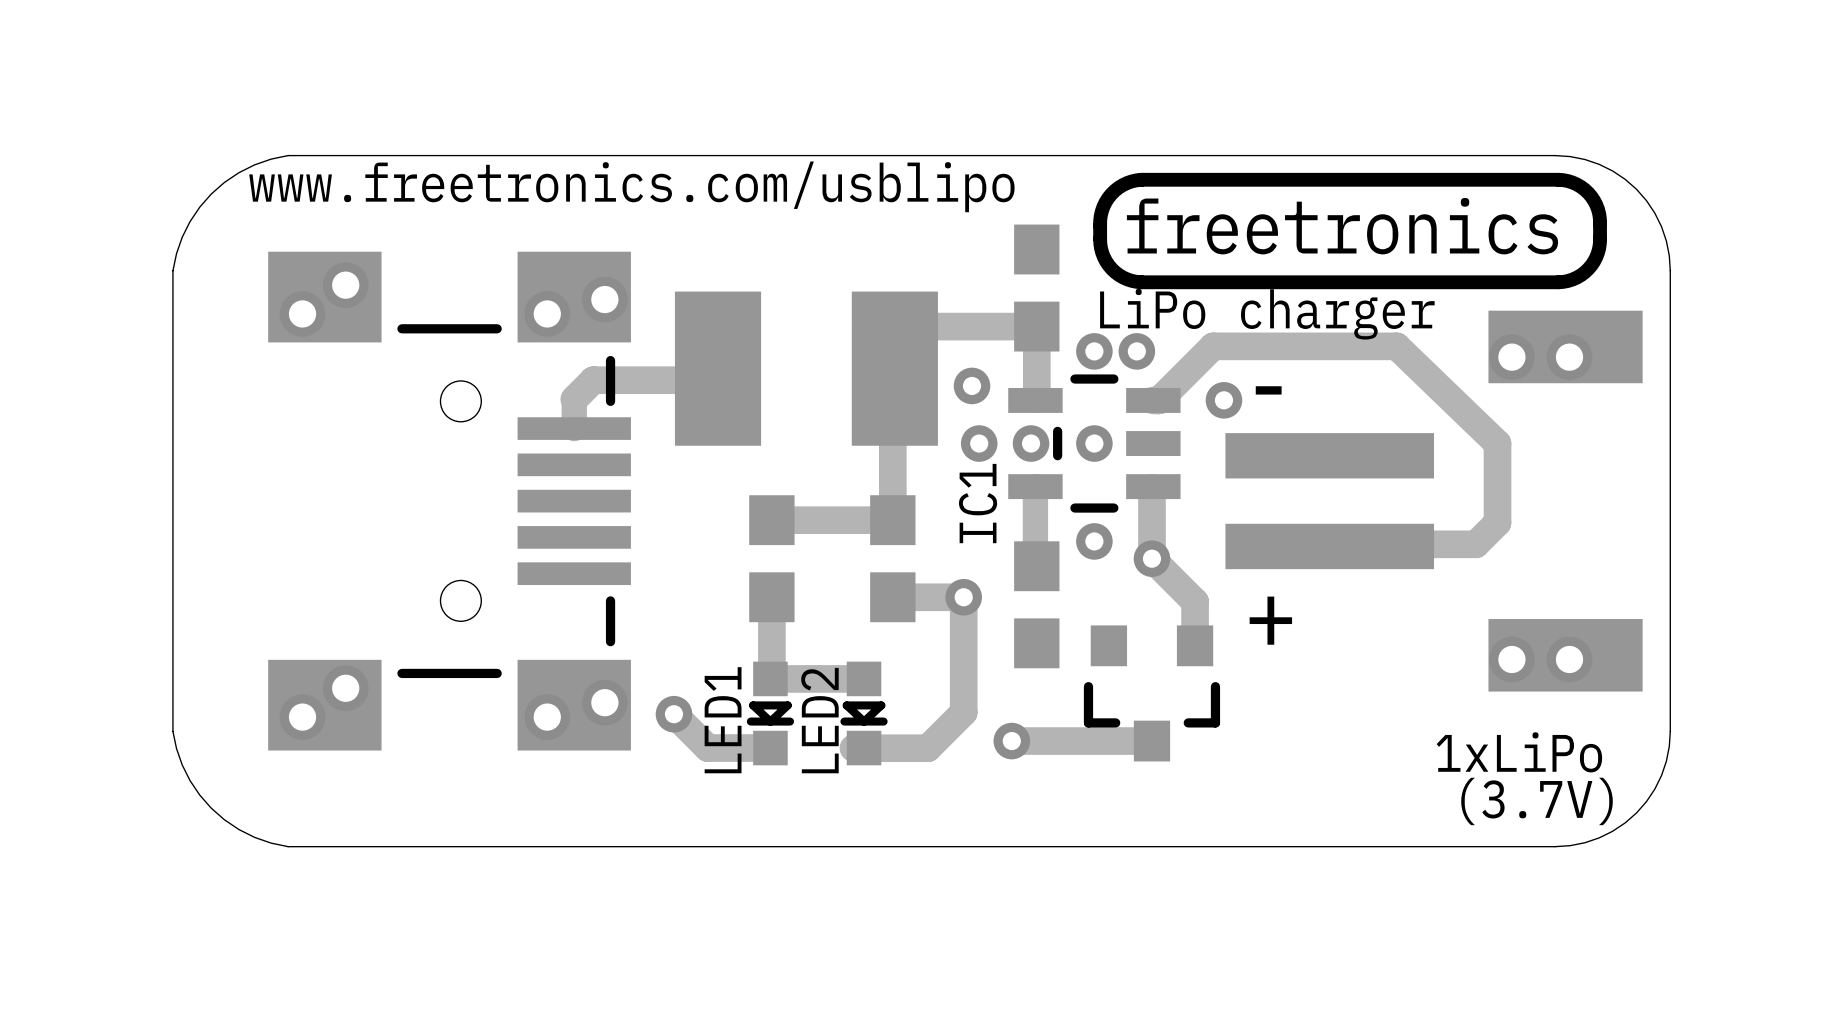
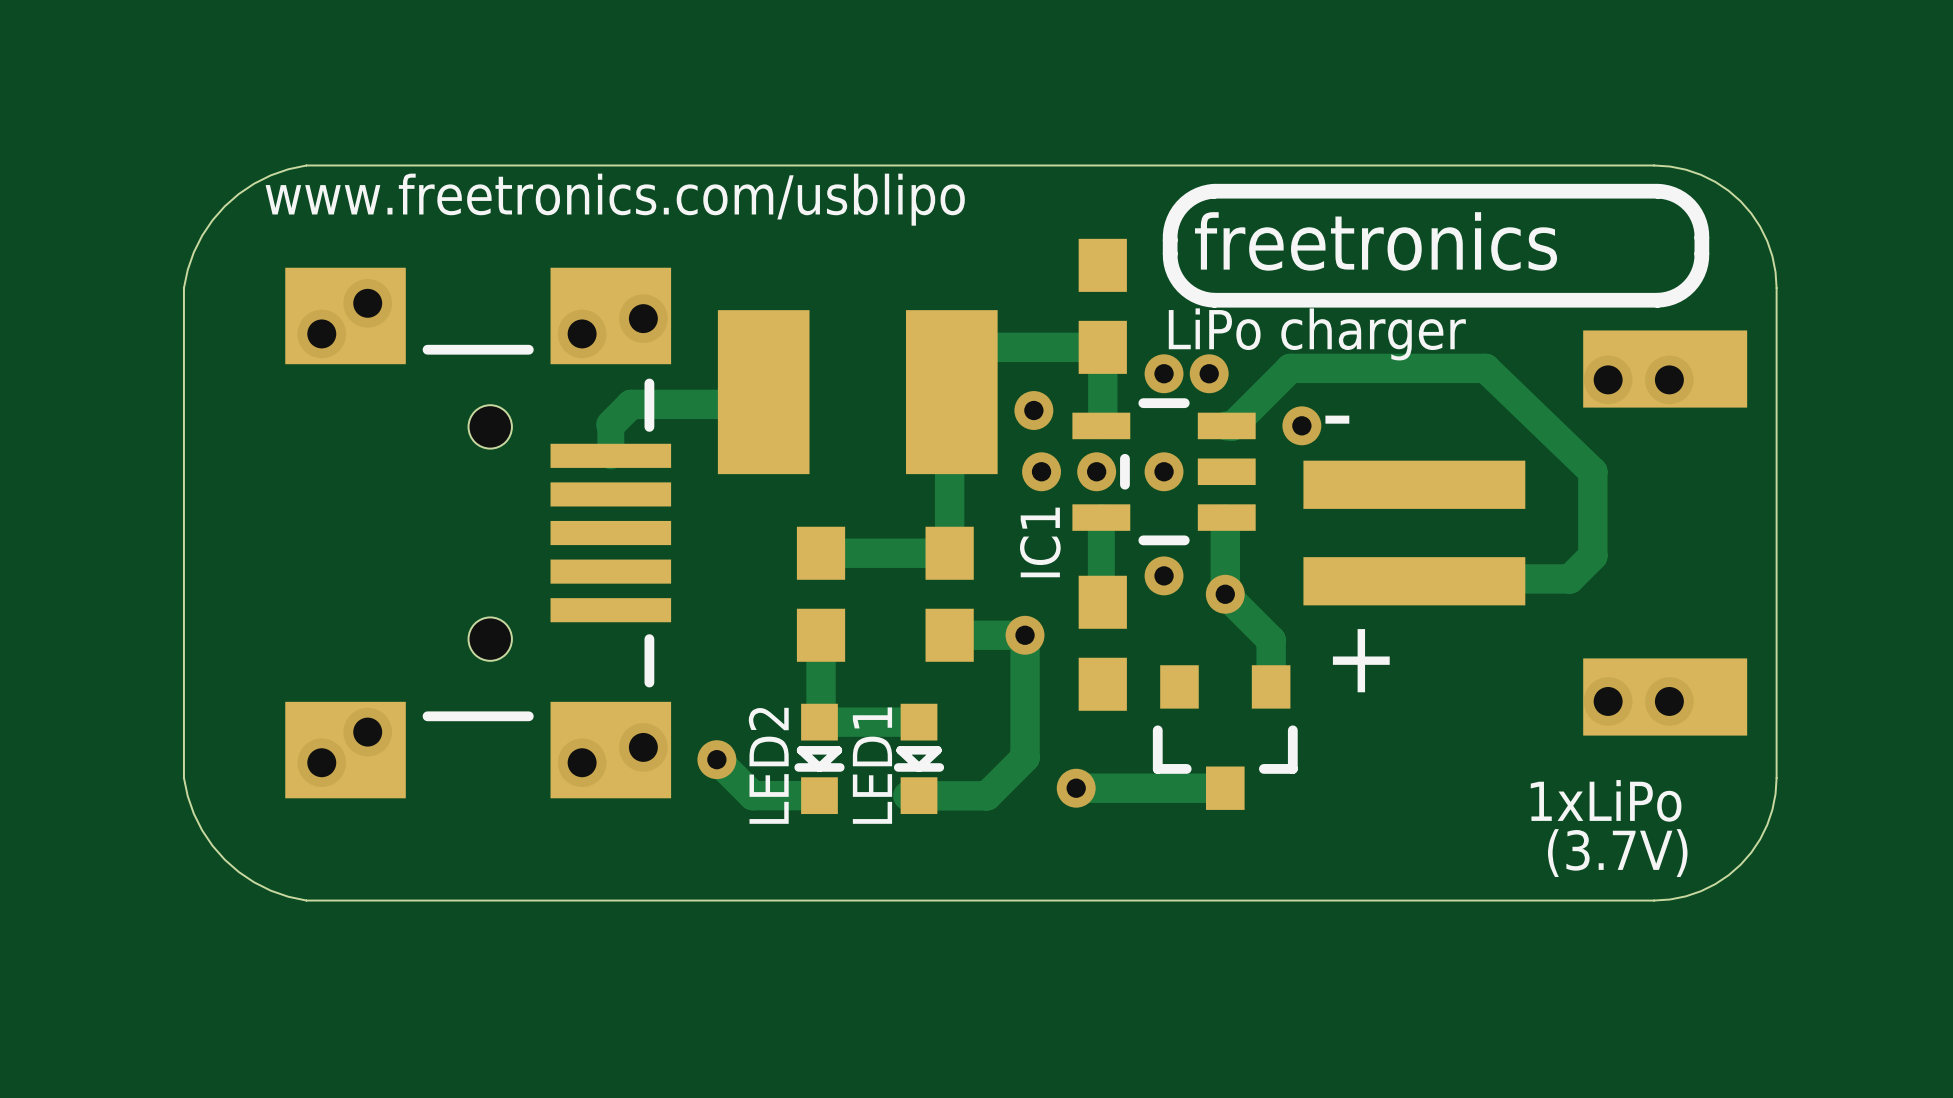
LED1 name: LED1 (723, 720) -> LED2 (768, 765)
LED2 name: LED2 (819, 720) -> LED1 (872, 765)

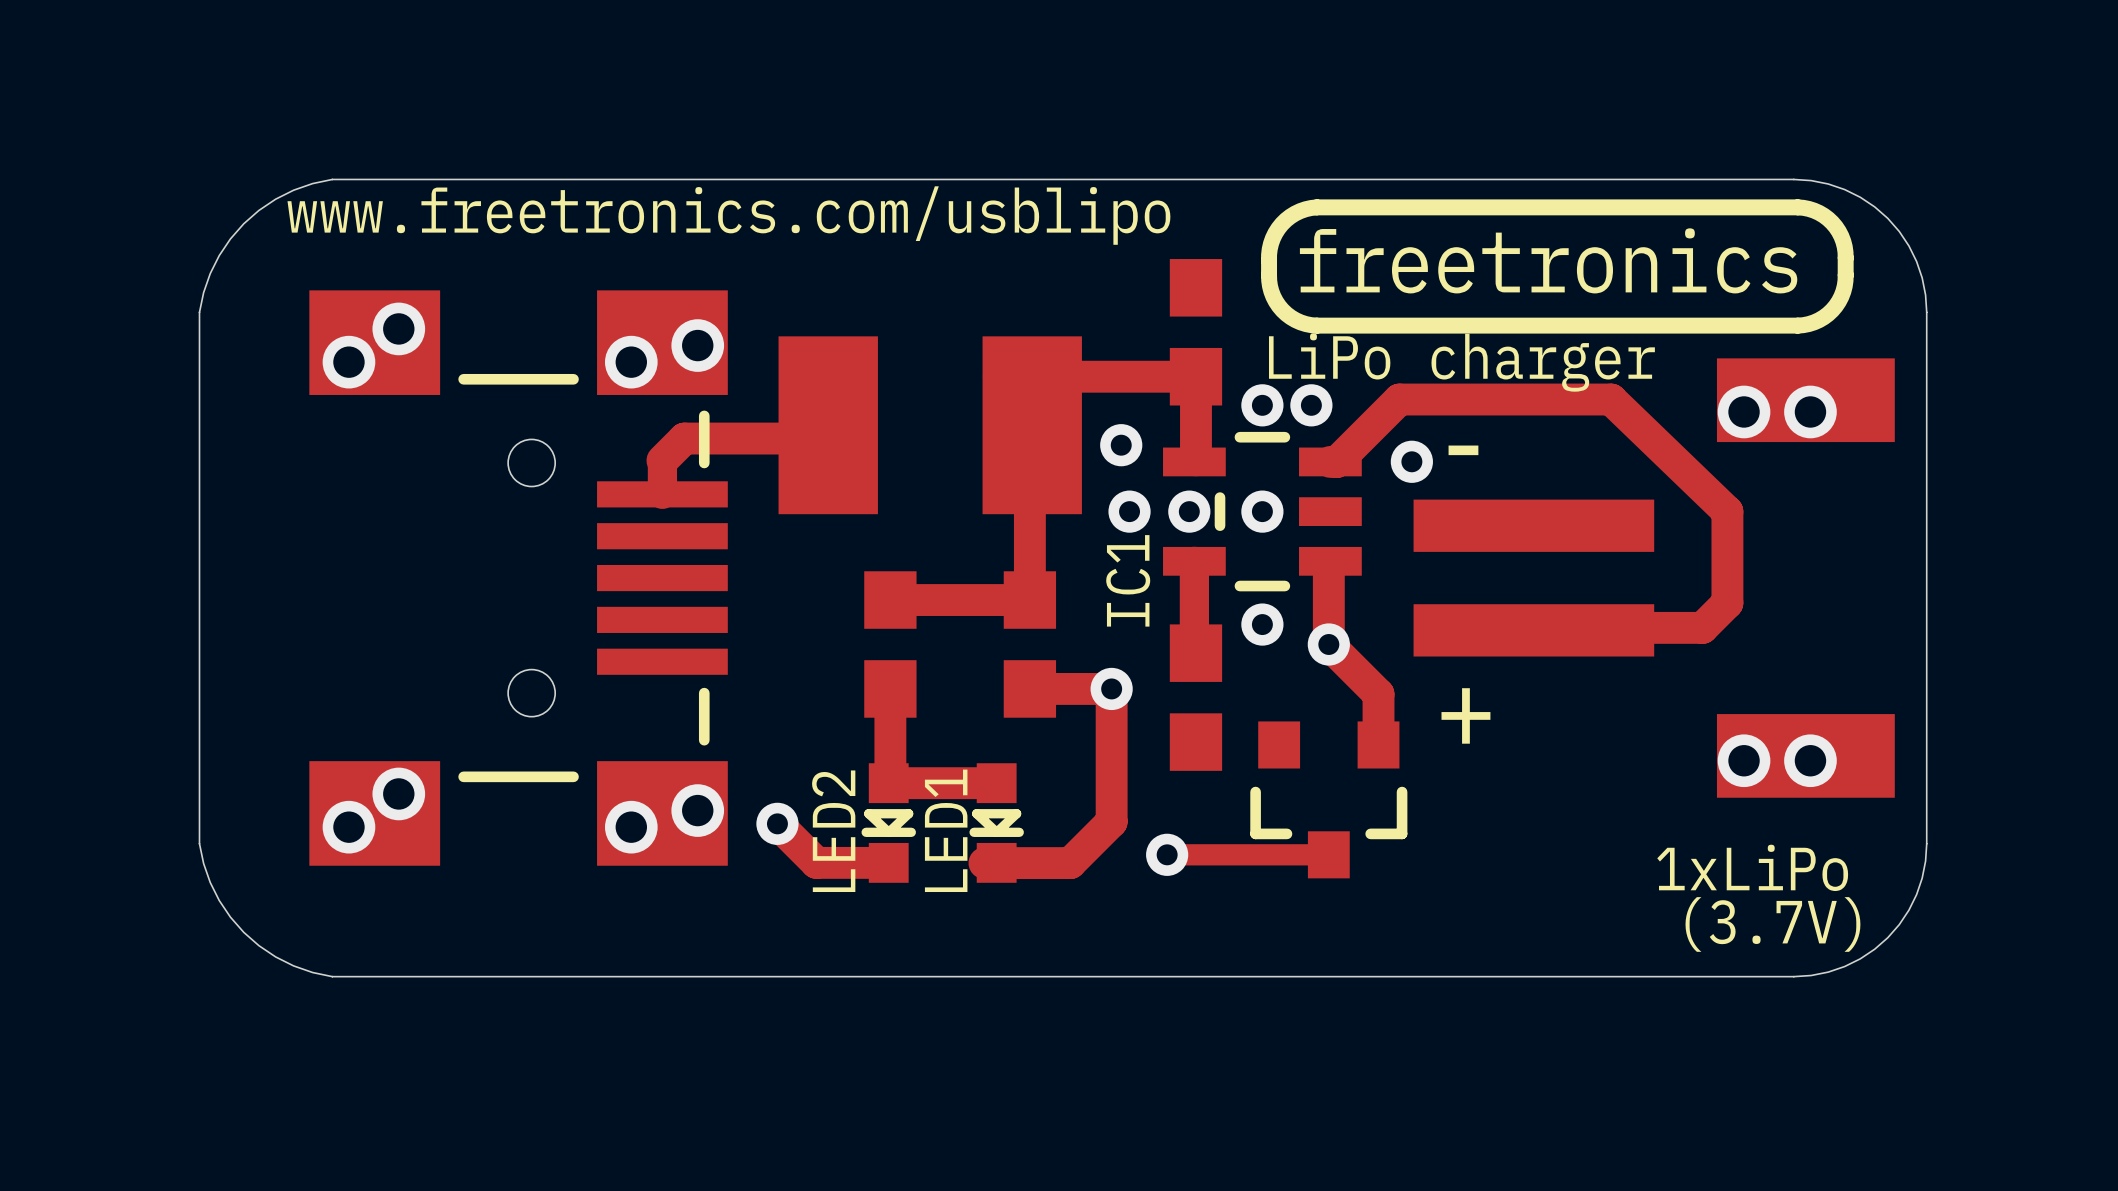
track width: thick (1076, 788) (1225, 788) -> thin (1167, 854) (1328, 854)

